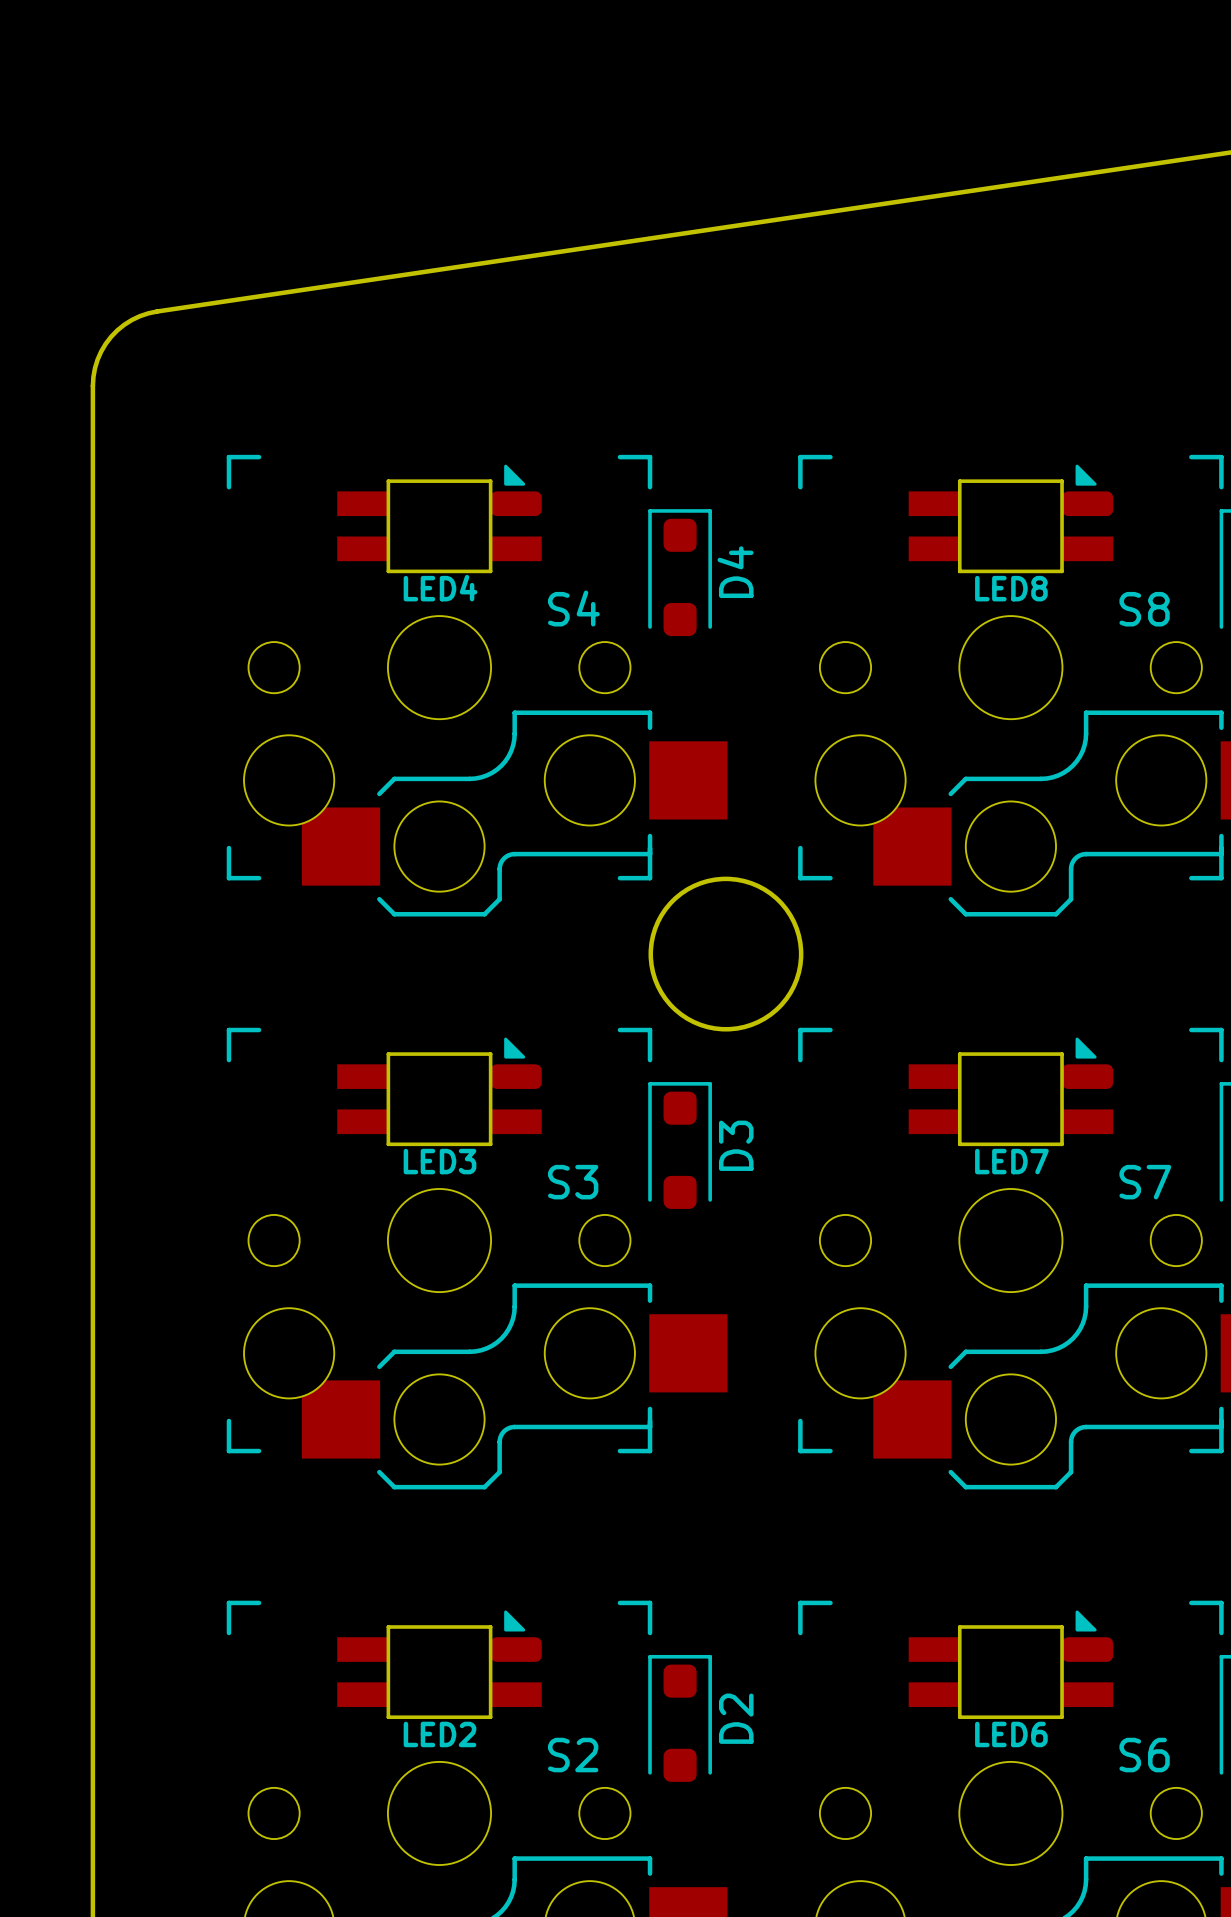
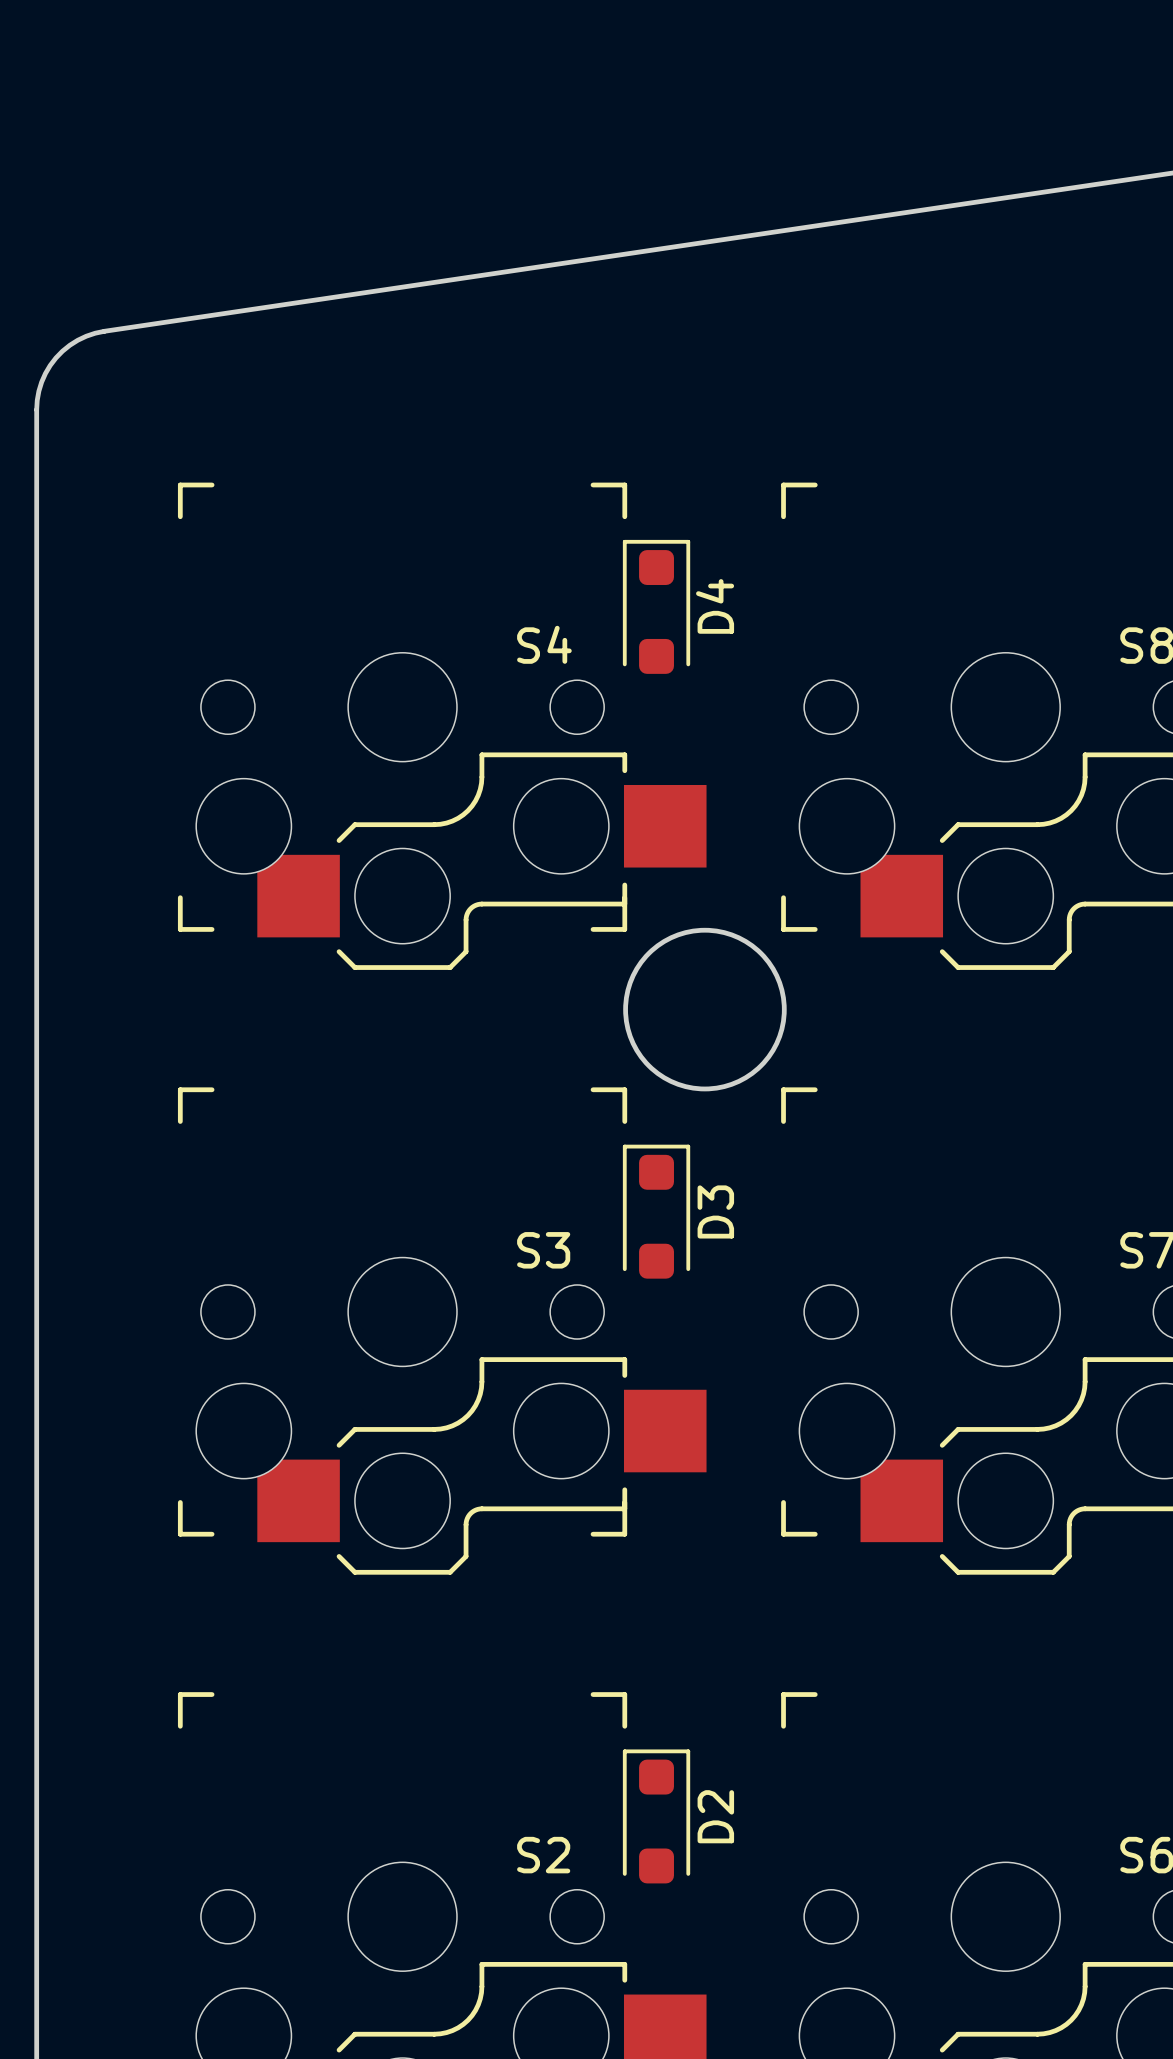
LED4: (439, 518) -> none
LED8: (1010, 518) -> none
LED3: (439, 1091) -> none
LED7: (1010, 1091) -> none
LED2: (439, 1664) -> none
LED6: (1010, 1664) -> none

